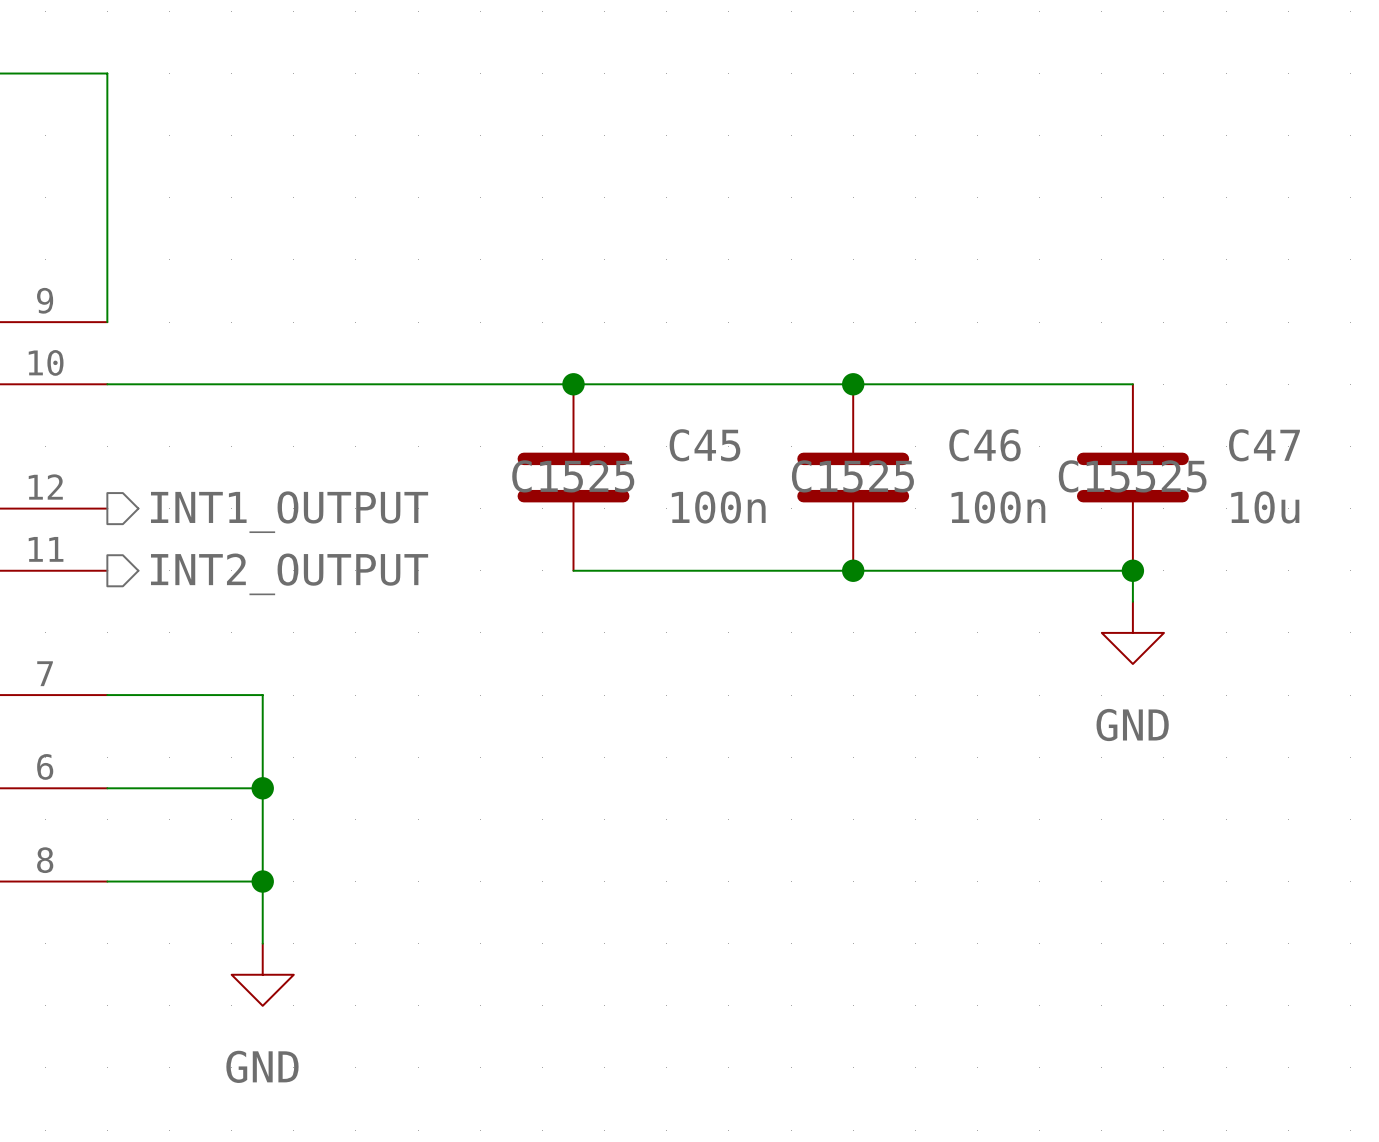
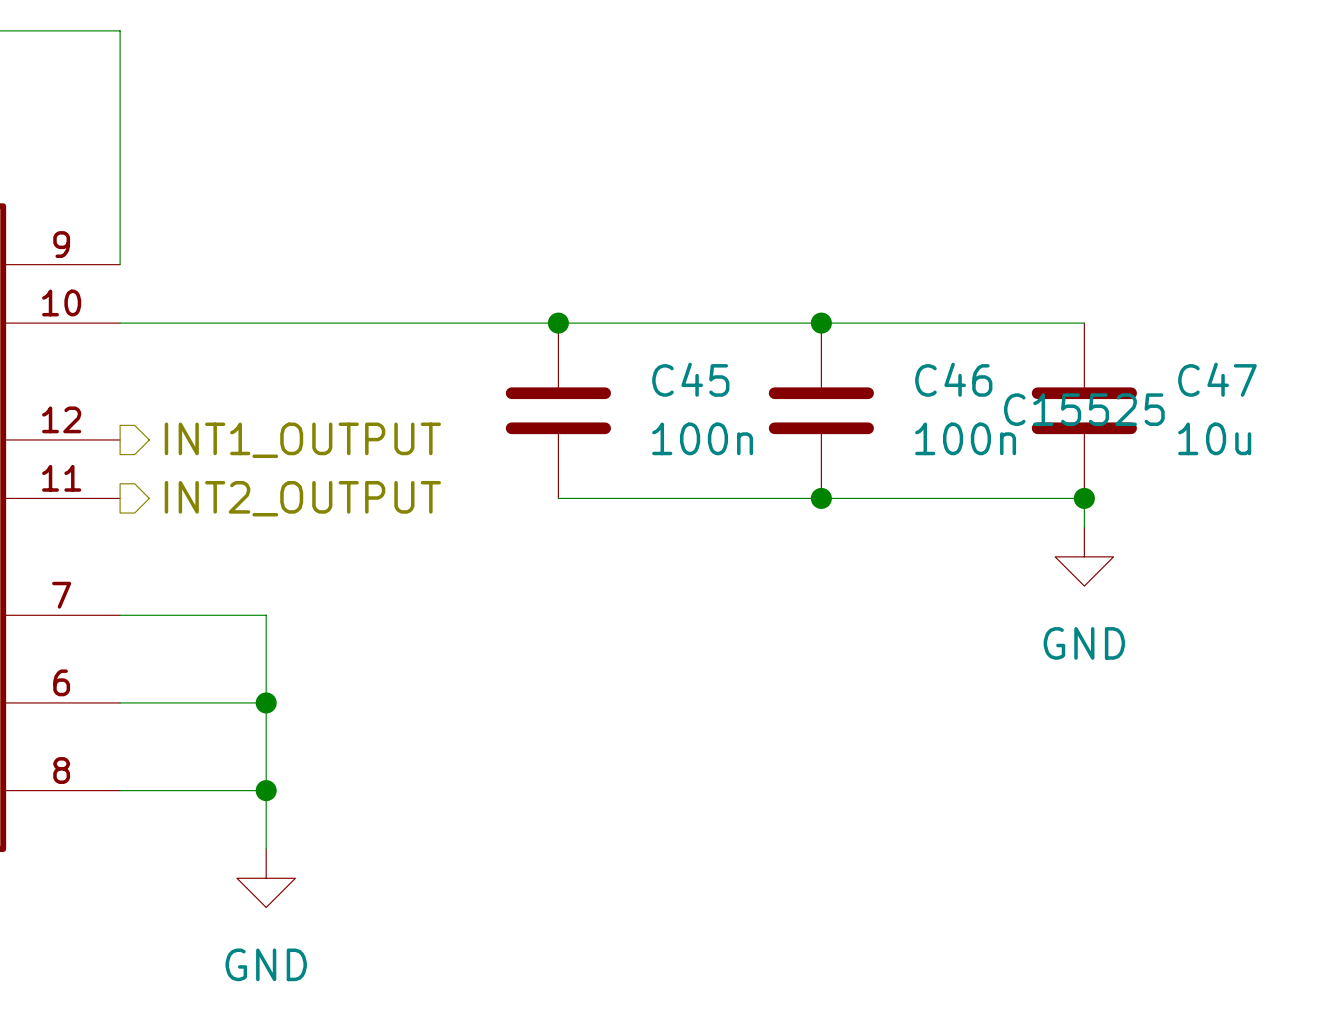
C45 text: C1525 (573, 476) -> none
C46 text: C1525 (852, 476) -> none

